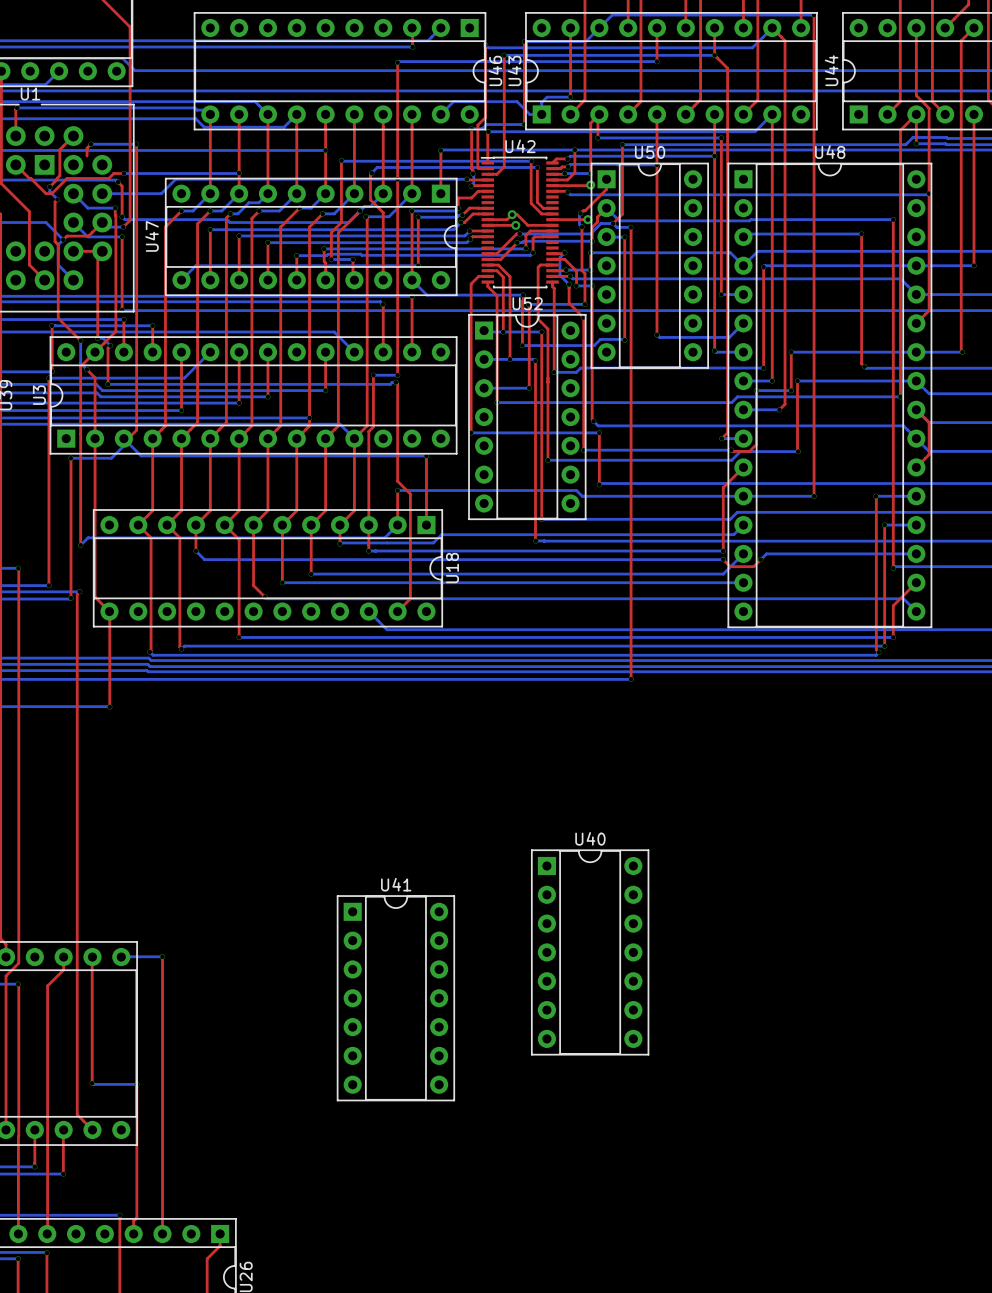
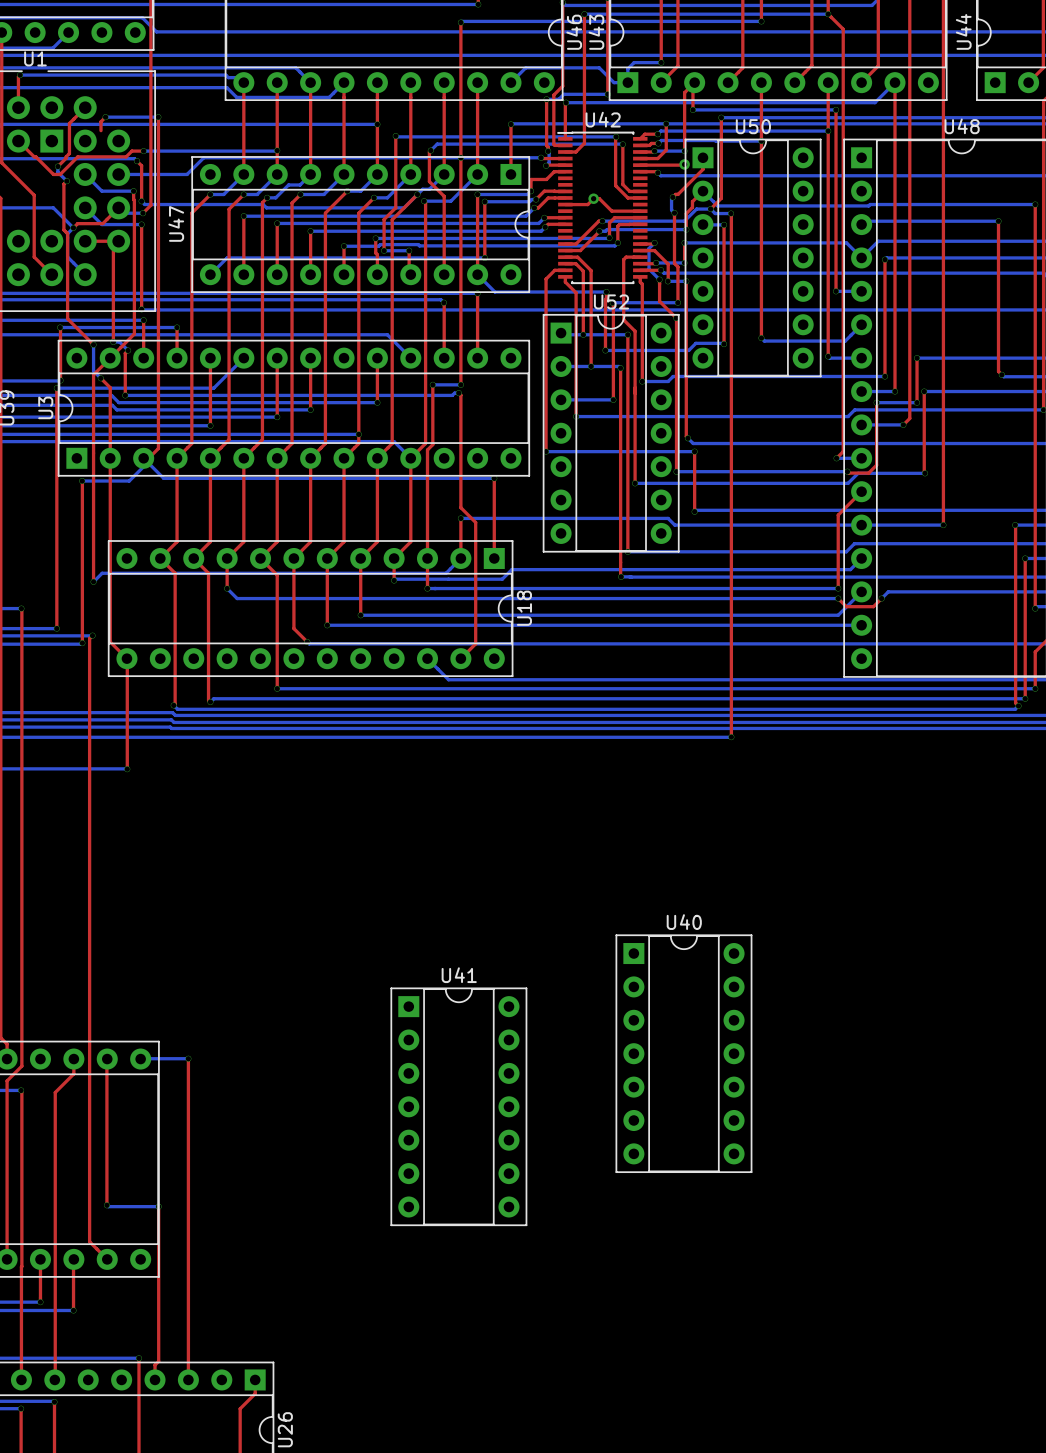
top track: (552, 219) (587, 219) -> none
via: (587, 219) -> none
top track: (487, 225) (515, 225) -> none
via: (515, 225) -> none

